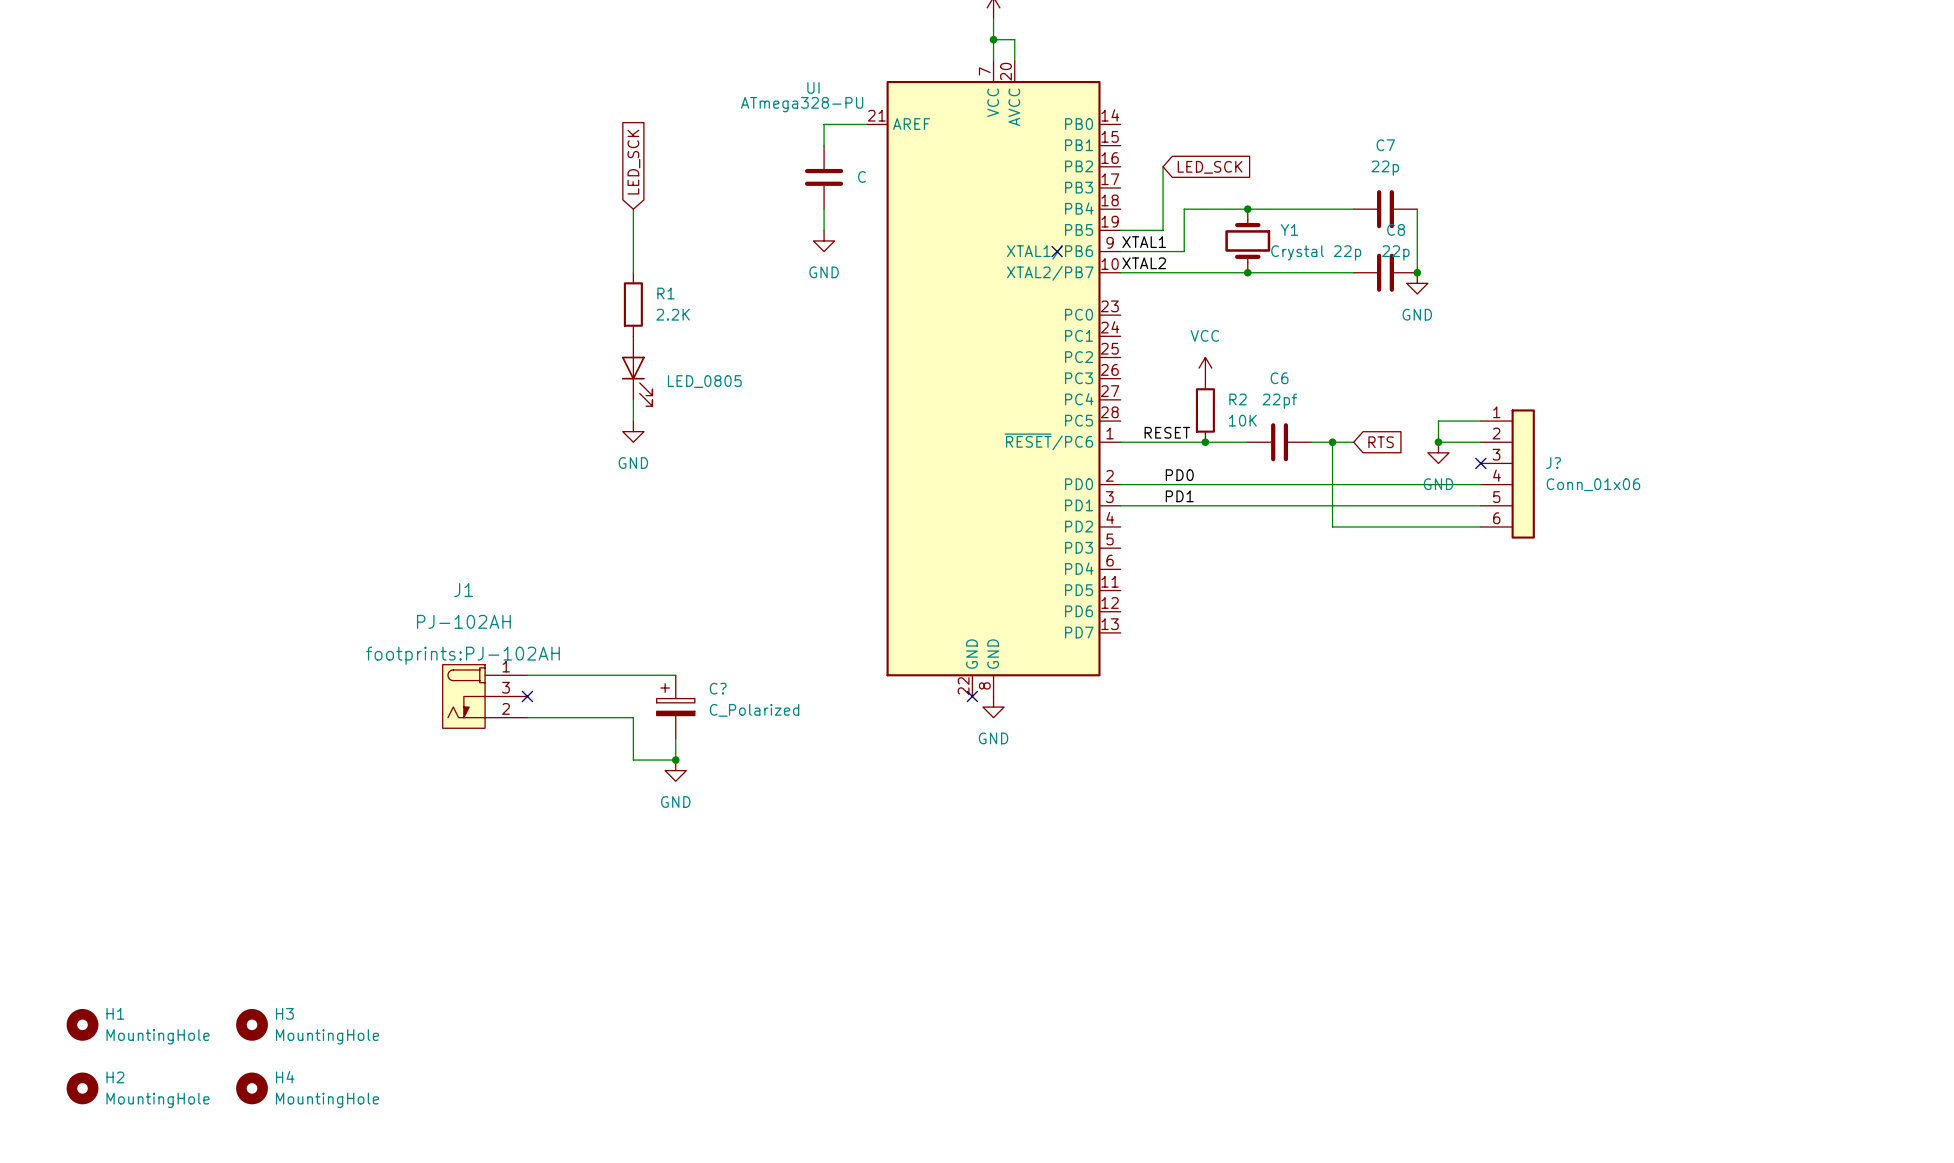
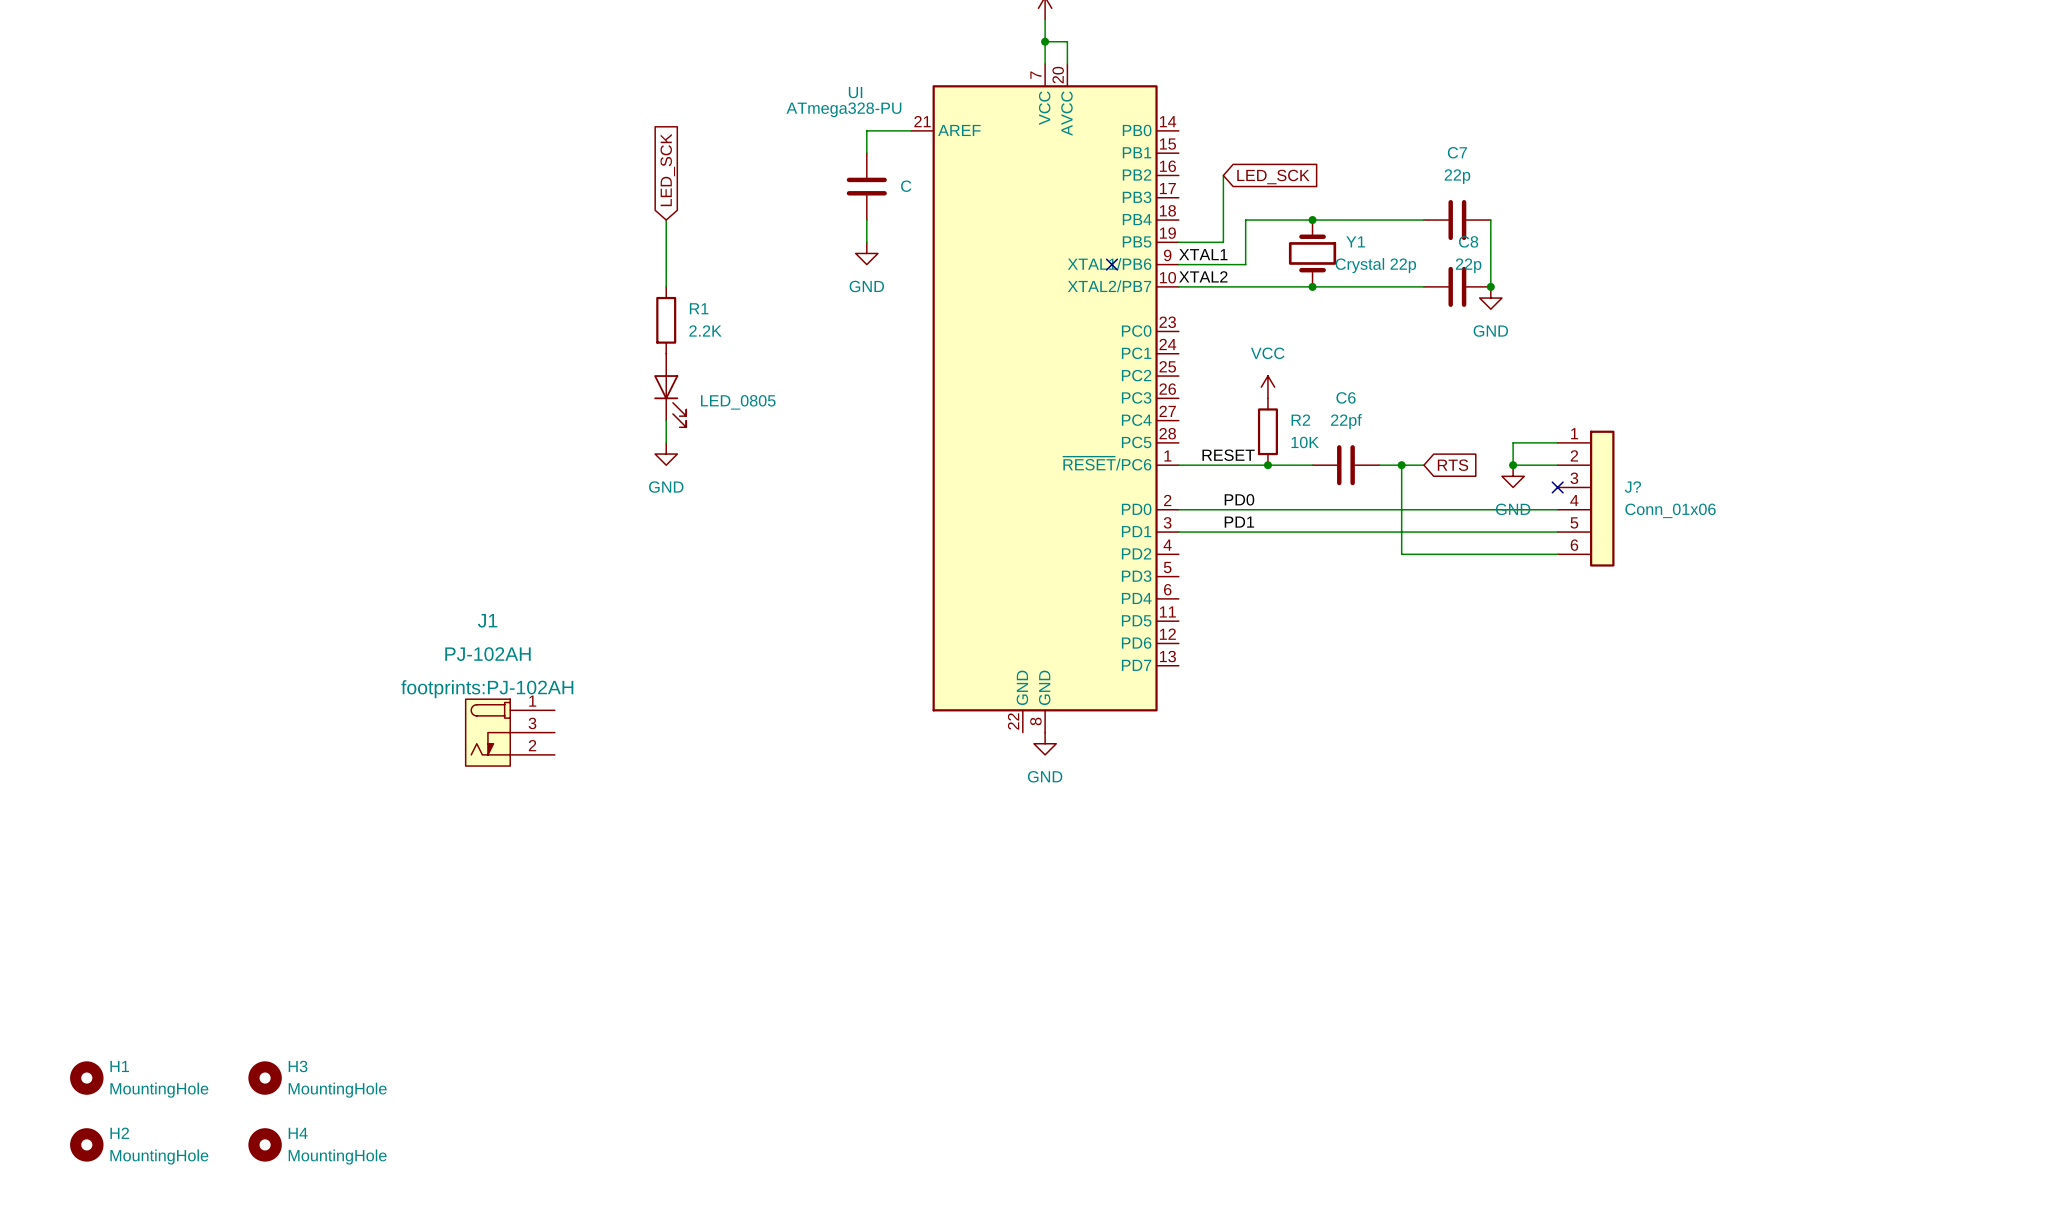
wire: (527, 675) (675, 675) -> none
no-connect mark: (527, 696) -> none
no-connect mark: (972, 696) -> none
C?: C_Polarized (675, 707) -> none
wire: (527, 717) (633, 717) (633, 760) (675, 760) (675, 738) -> none
junction: (675, 760) -> none
power symbol: GND (675, 770) -> none

